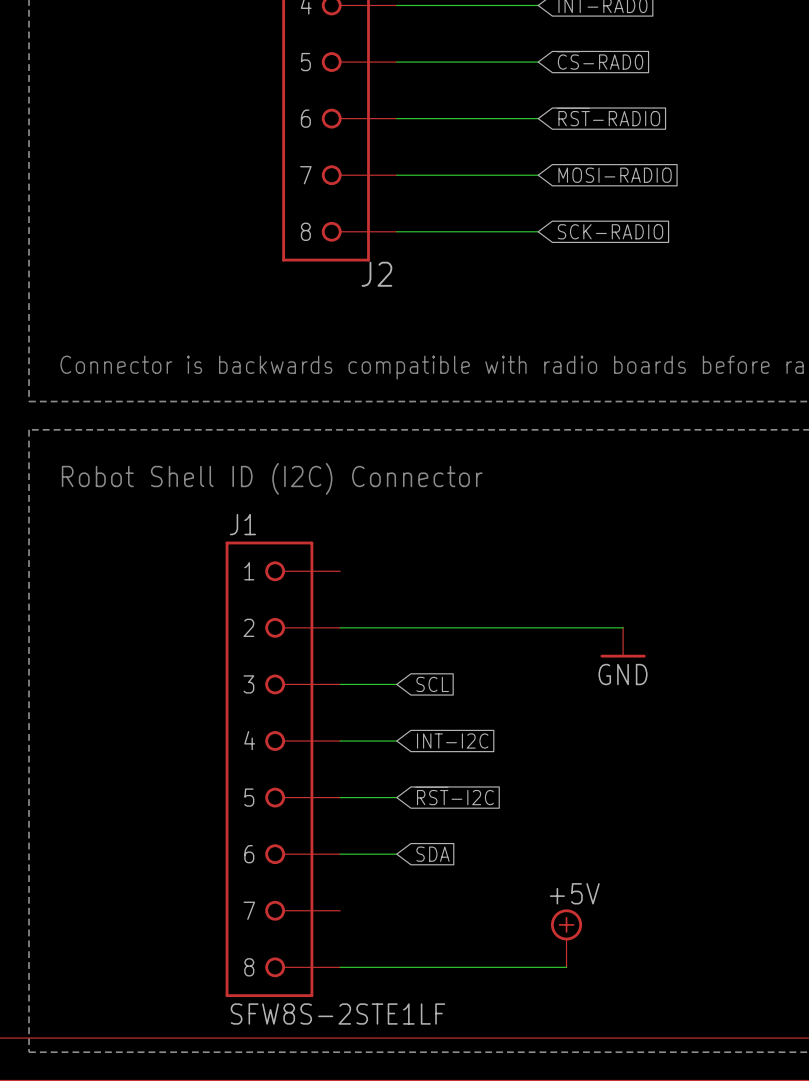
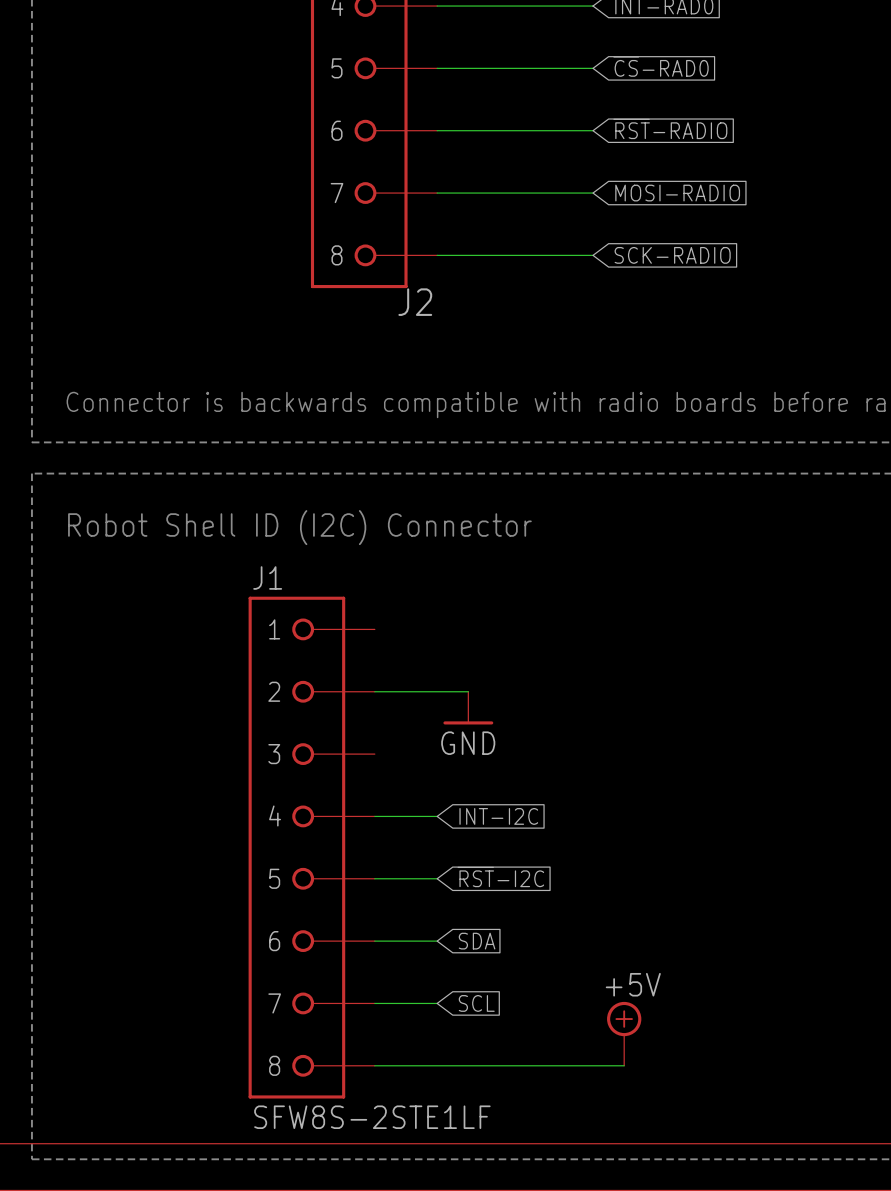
wire: (425, 627) (623, 627) -> none
power symbol position: GND (623, 642) -> GND (468, 708)
wire: (340, 684) (396, 684) -> (374, 1003) (437, 1003)
global label position: SCL (432, 684) -> SCL (476, 1003)

